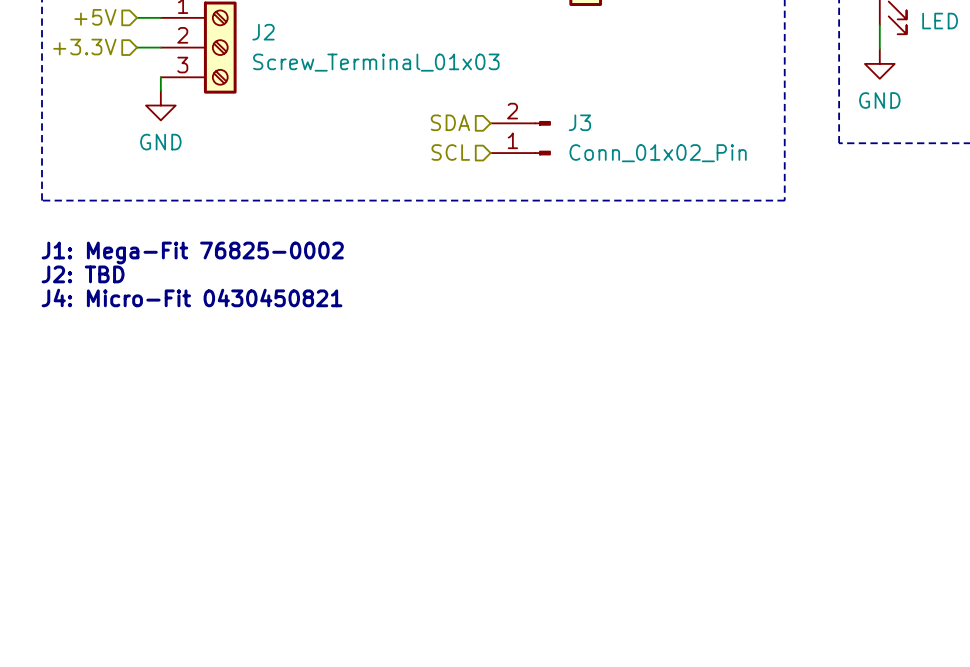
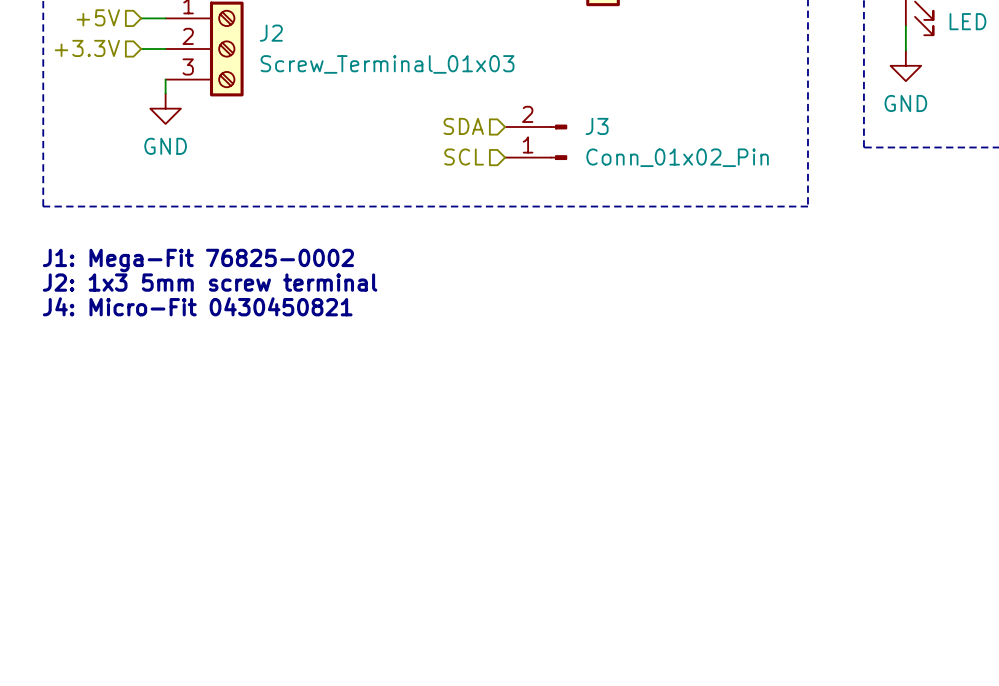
text: J2: TBD (83, 274) -> J2: 1x3 5mm screw terminal (210, 282)

